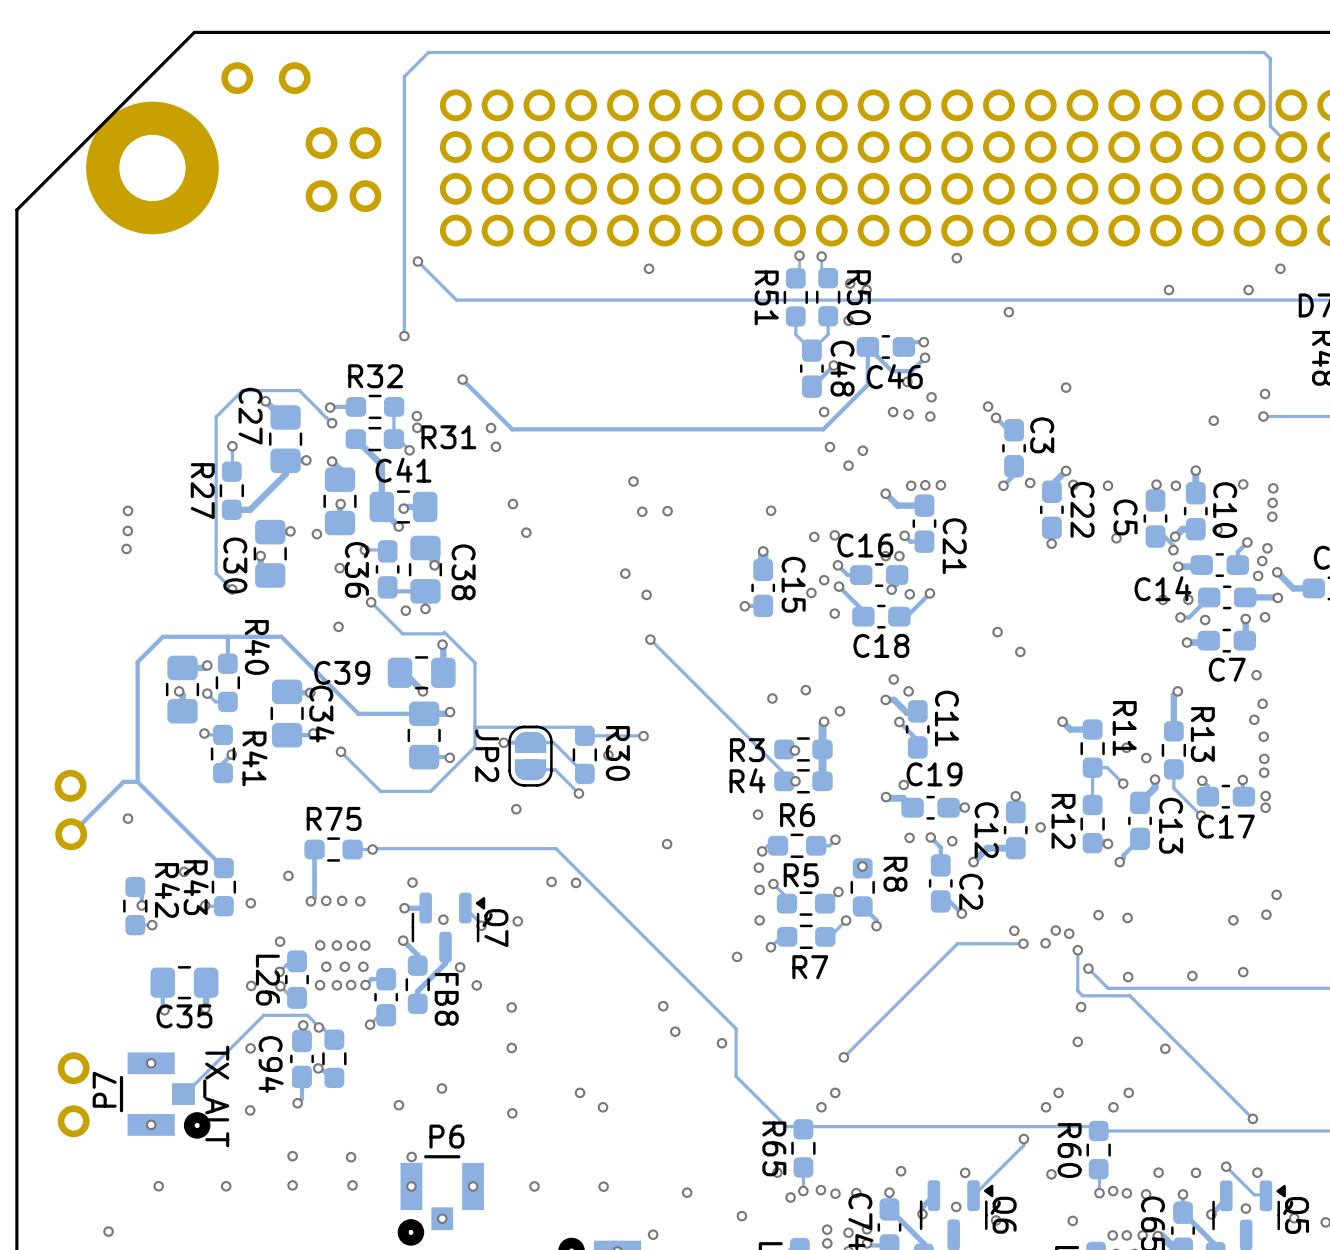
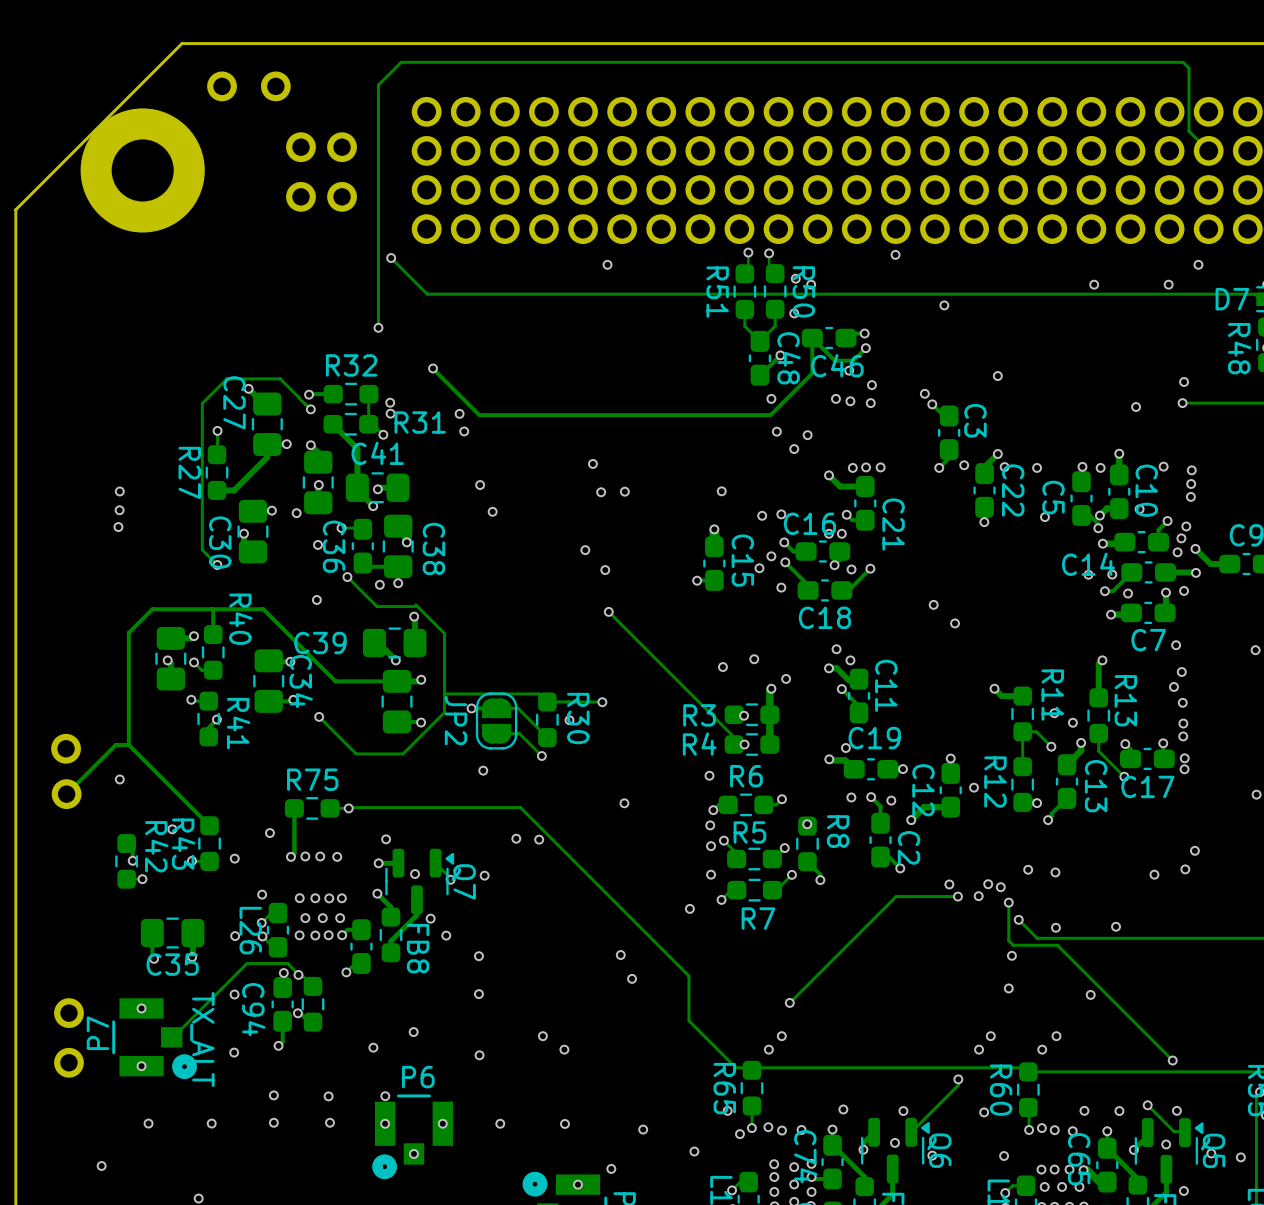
via: (1243, 972) -> none
via: (721, 1043) -> none

